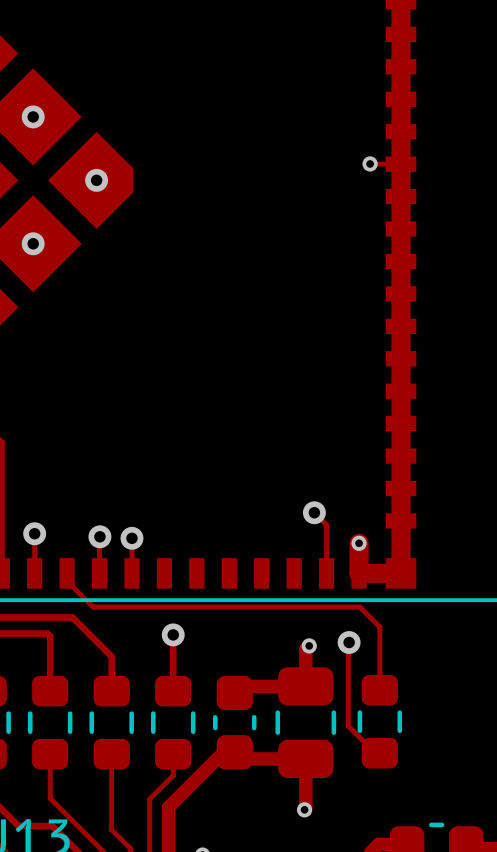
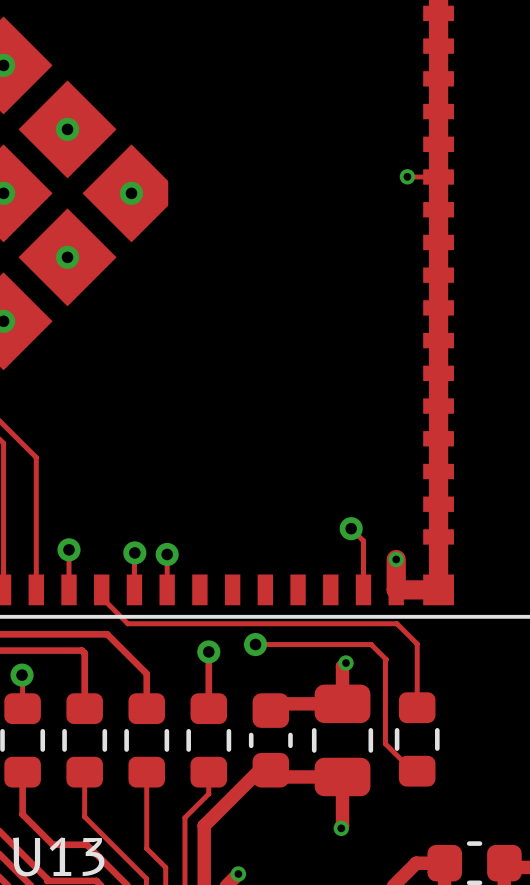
track: none -> (255, 644) (371, 644) (386, 659)
via position: (349, 642) -> (255, 644)

